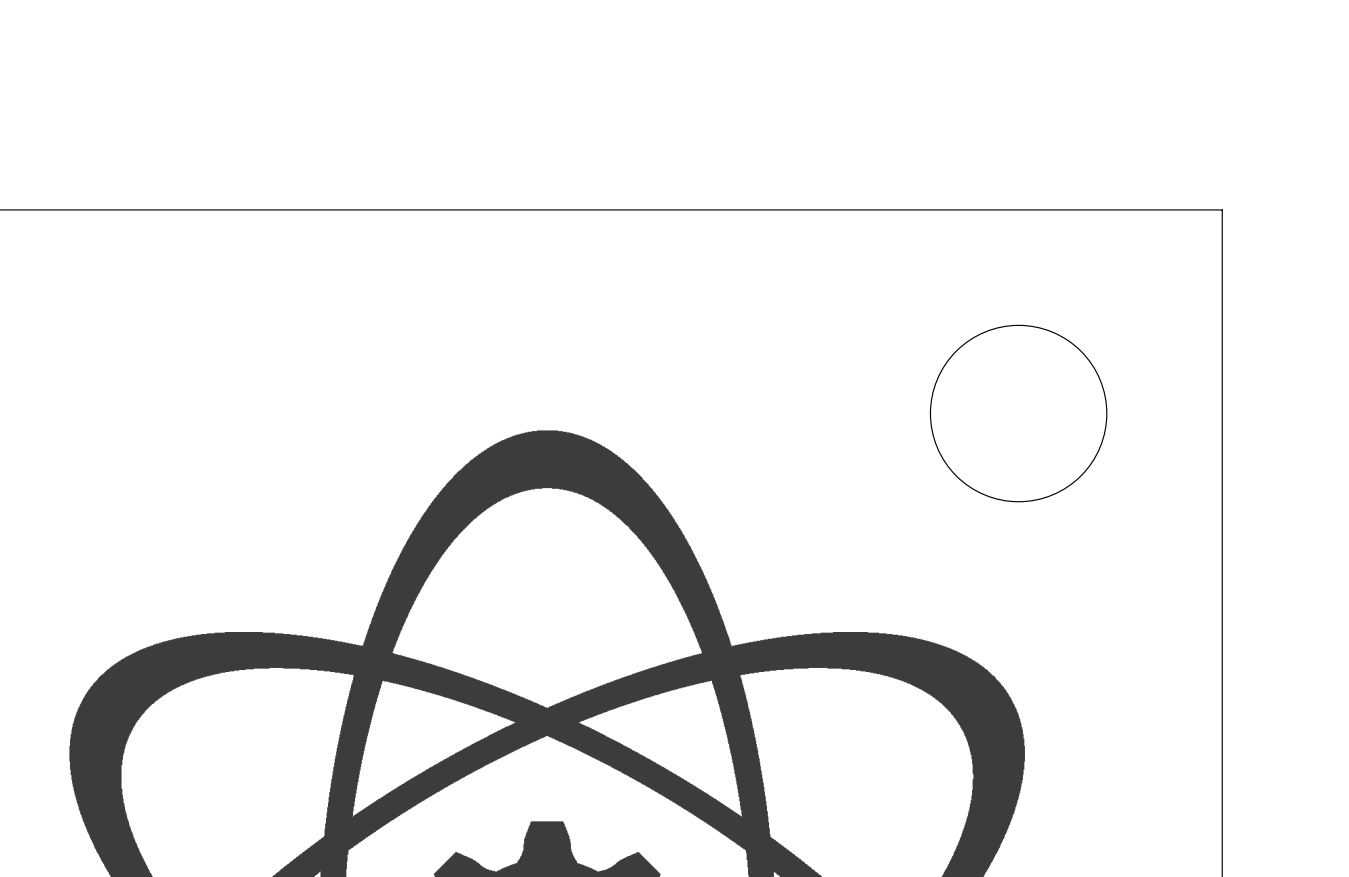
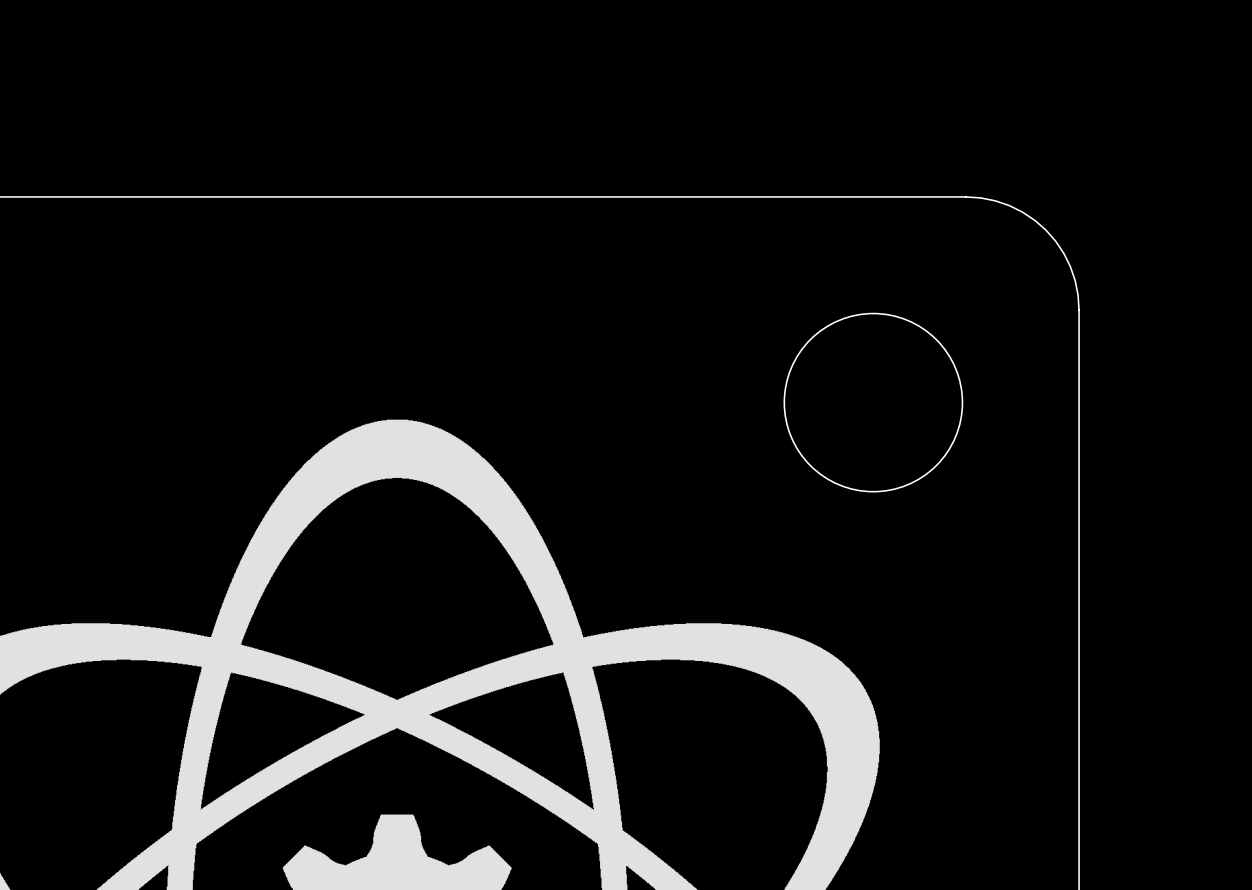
board edge: (1110, 209) (1222, 209) (1222, 321) -> (965, 196) (995, 200) (1009, 205) (1034, 220) (1045, 230) (1055, 241) (1070, 266) (1075, 280) (1079, 310)

